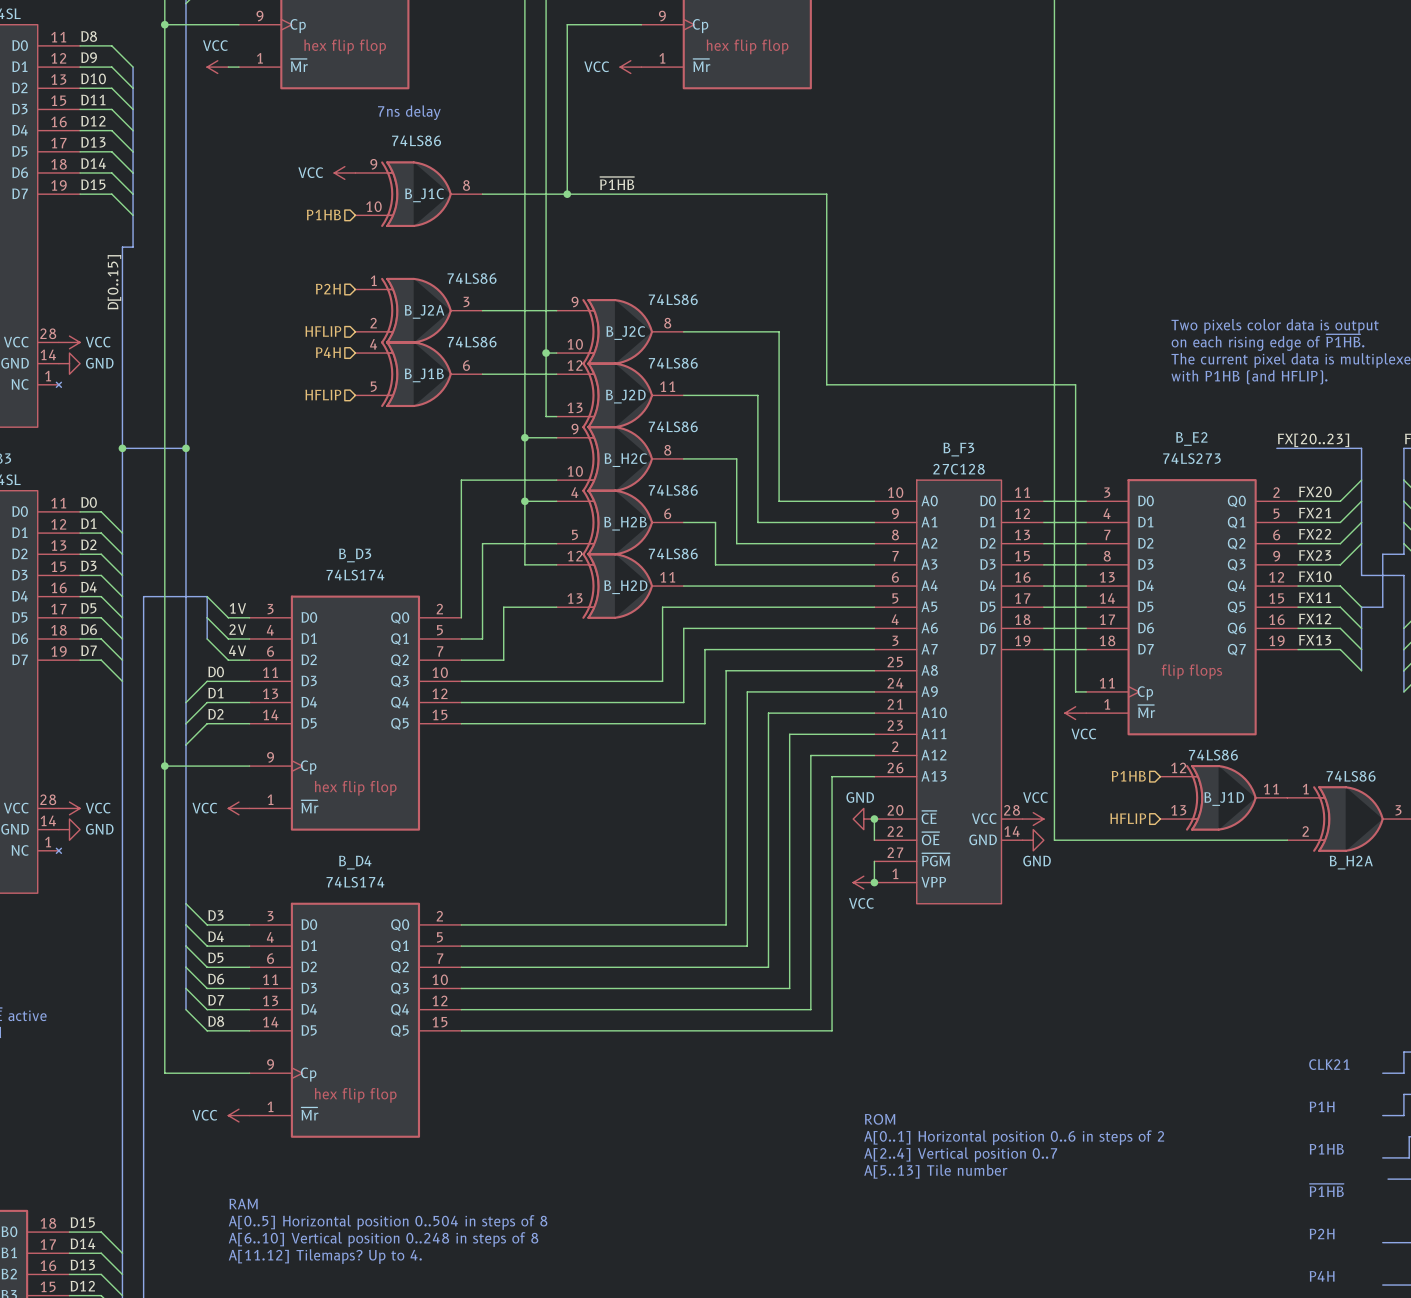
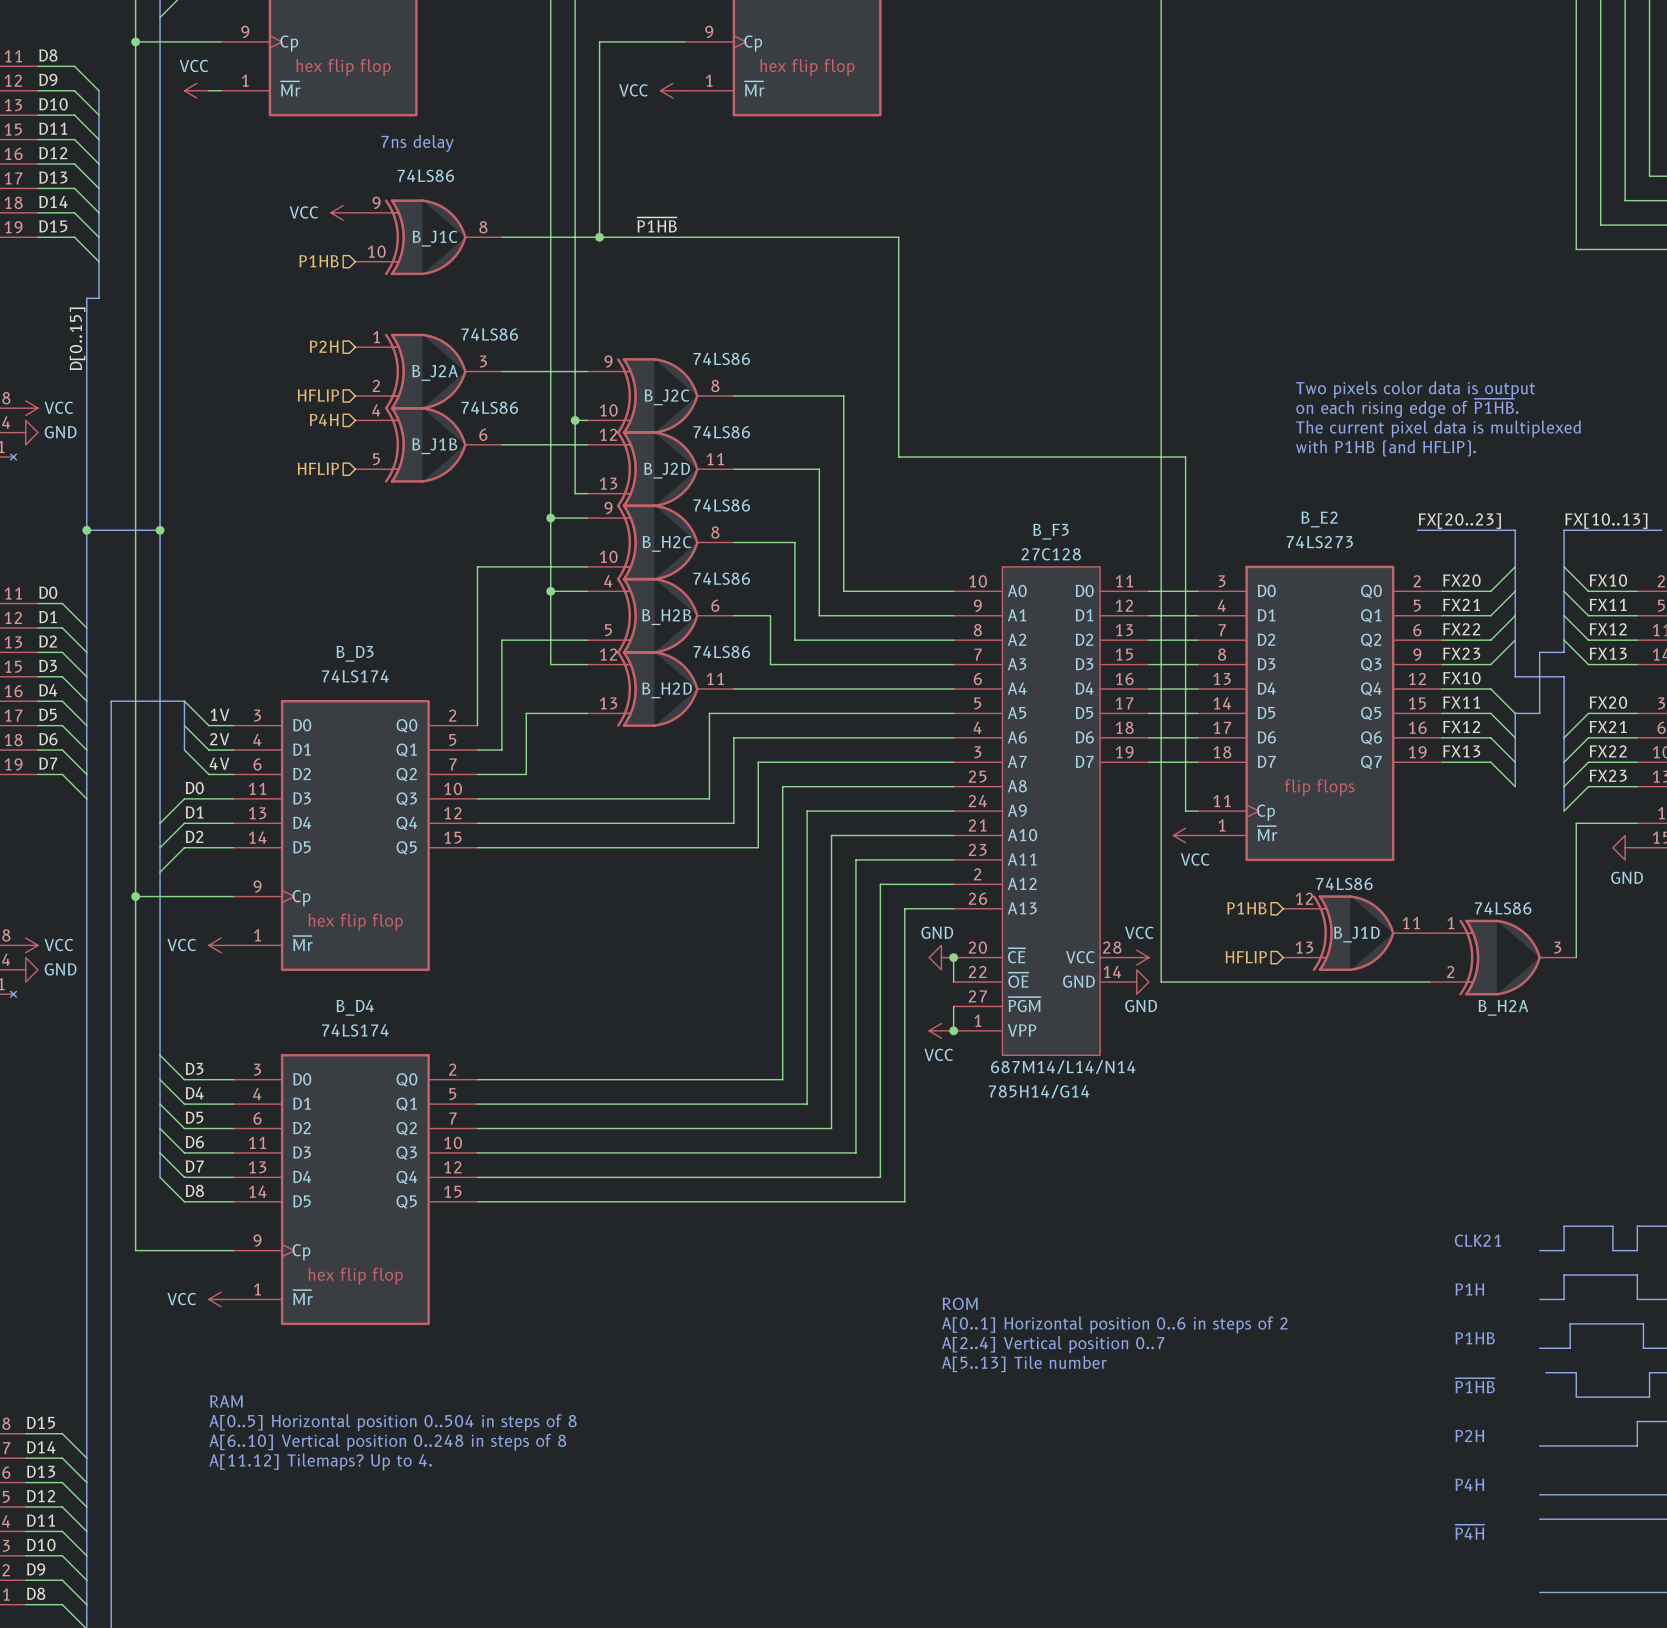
B_F3 text: none -> 687M14/L14/N14 (1063, 1067)
B_F3 text: none -> 785H14/G14 (1039, 1091)

